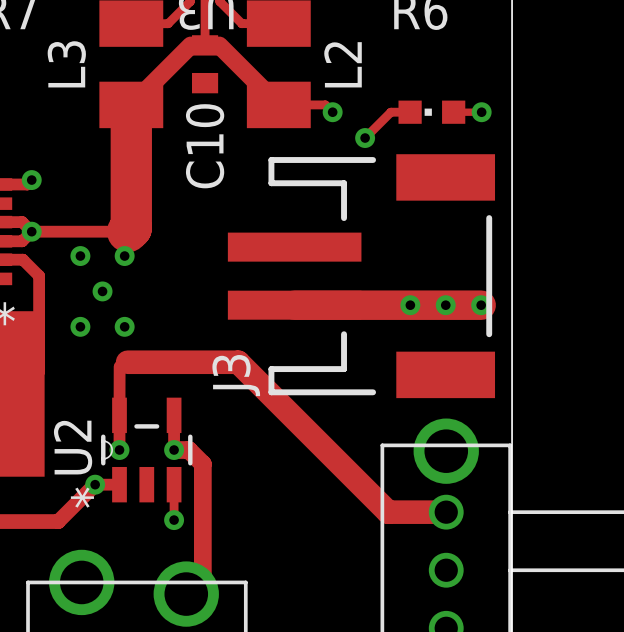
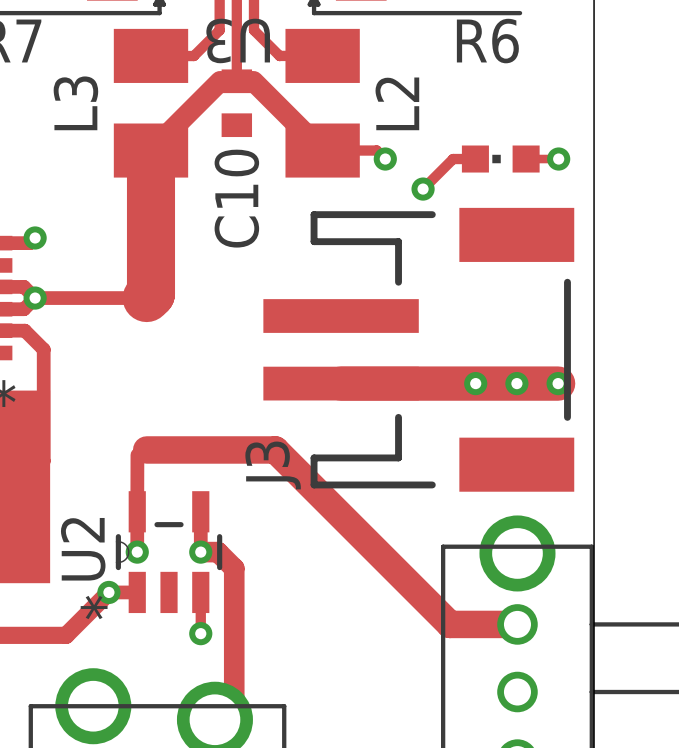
via: (80, 256) -> none
via: (124, 256) -> none
via: (102, 291) -> none
via: (80, 326) -> none
via: (124, 326) -> none

